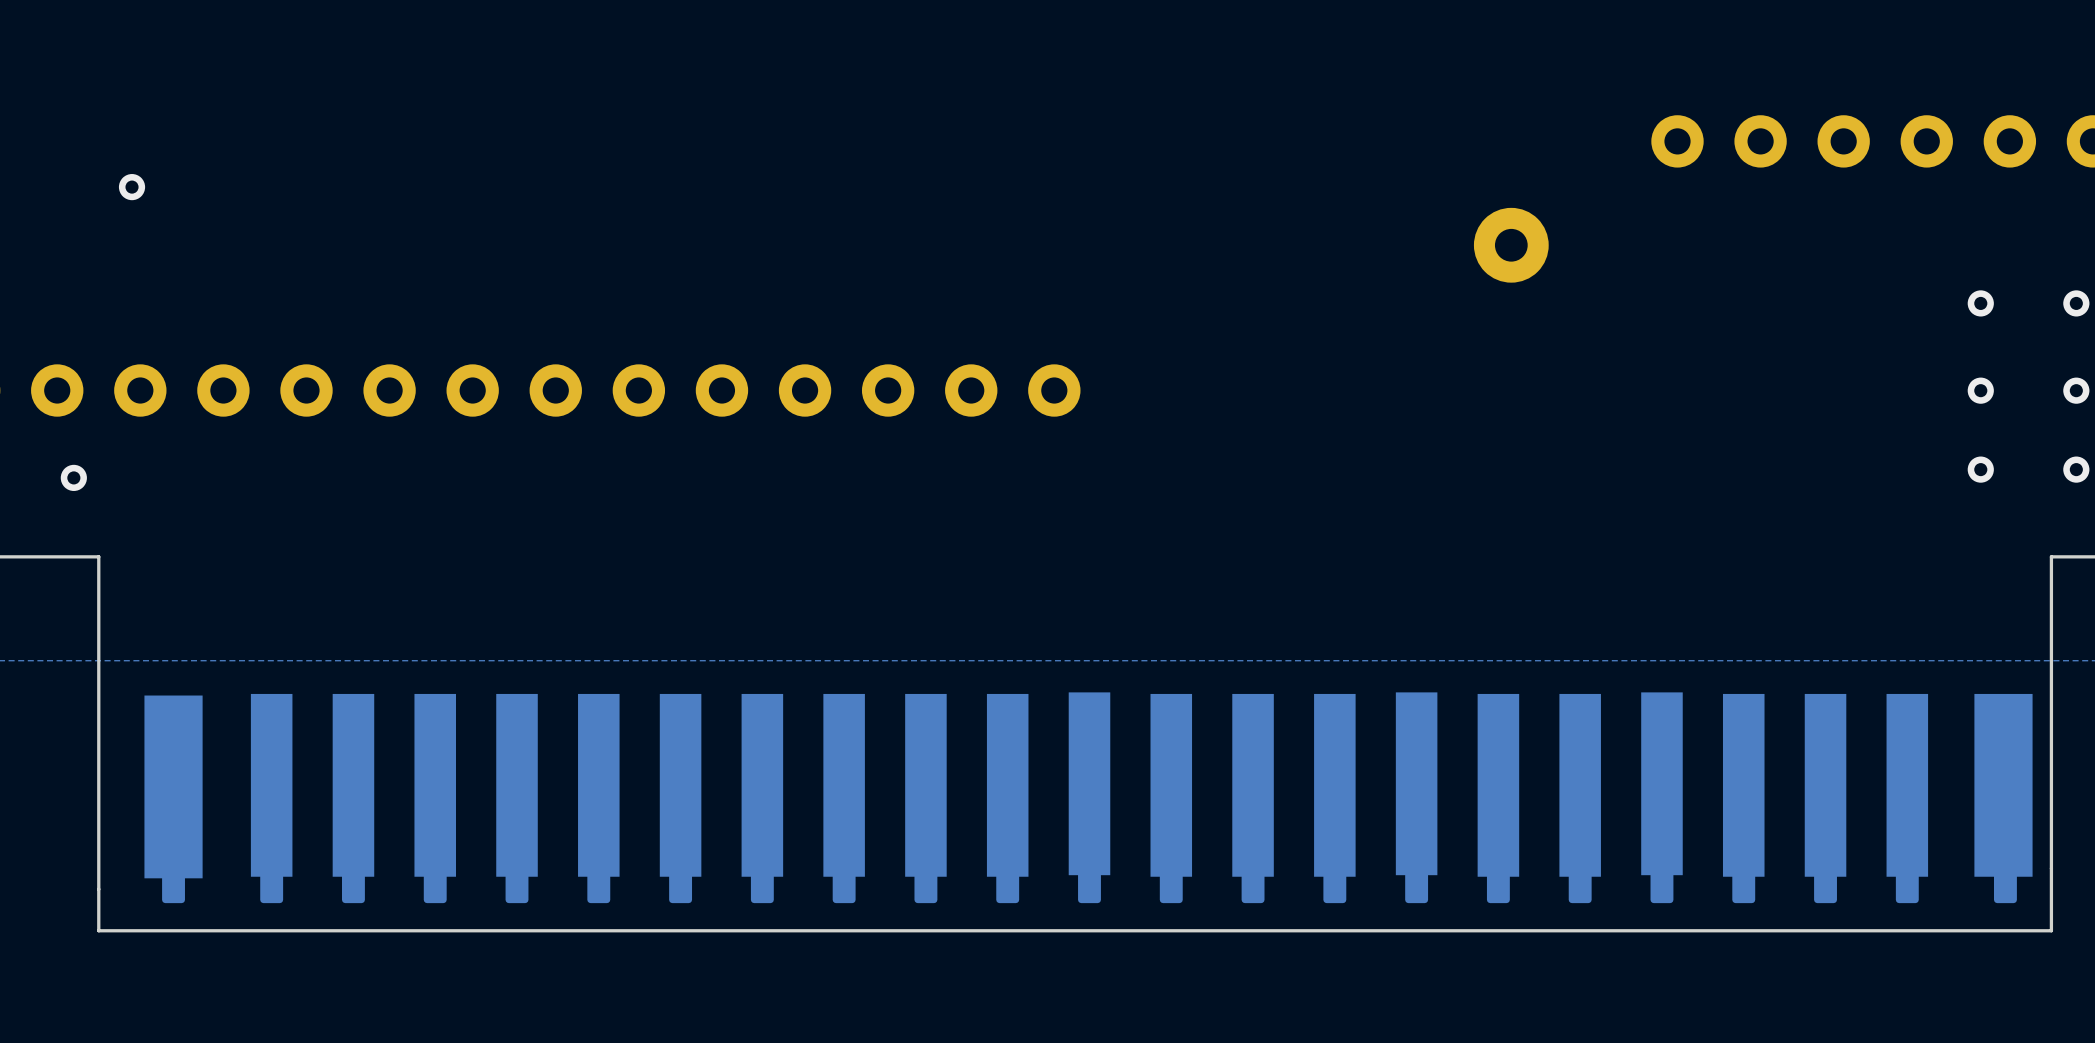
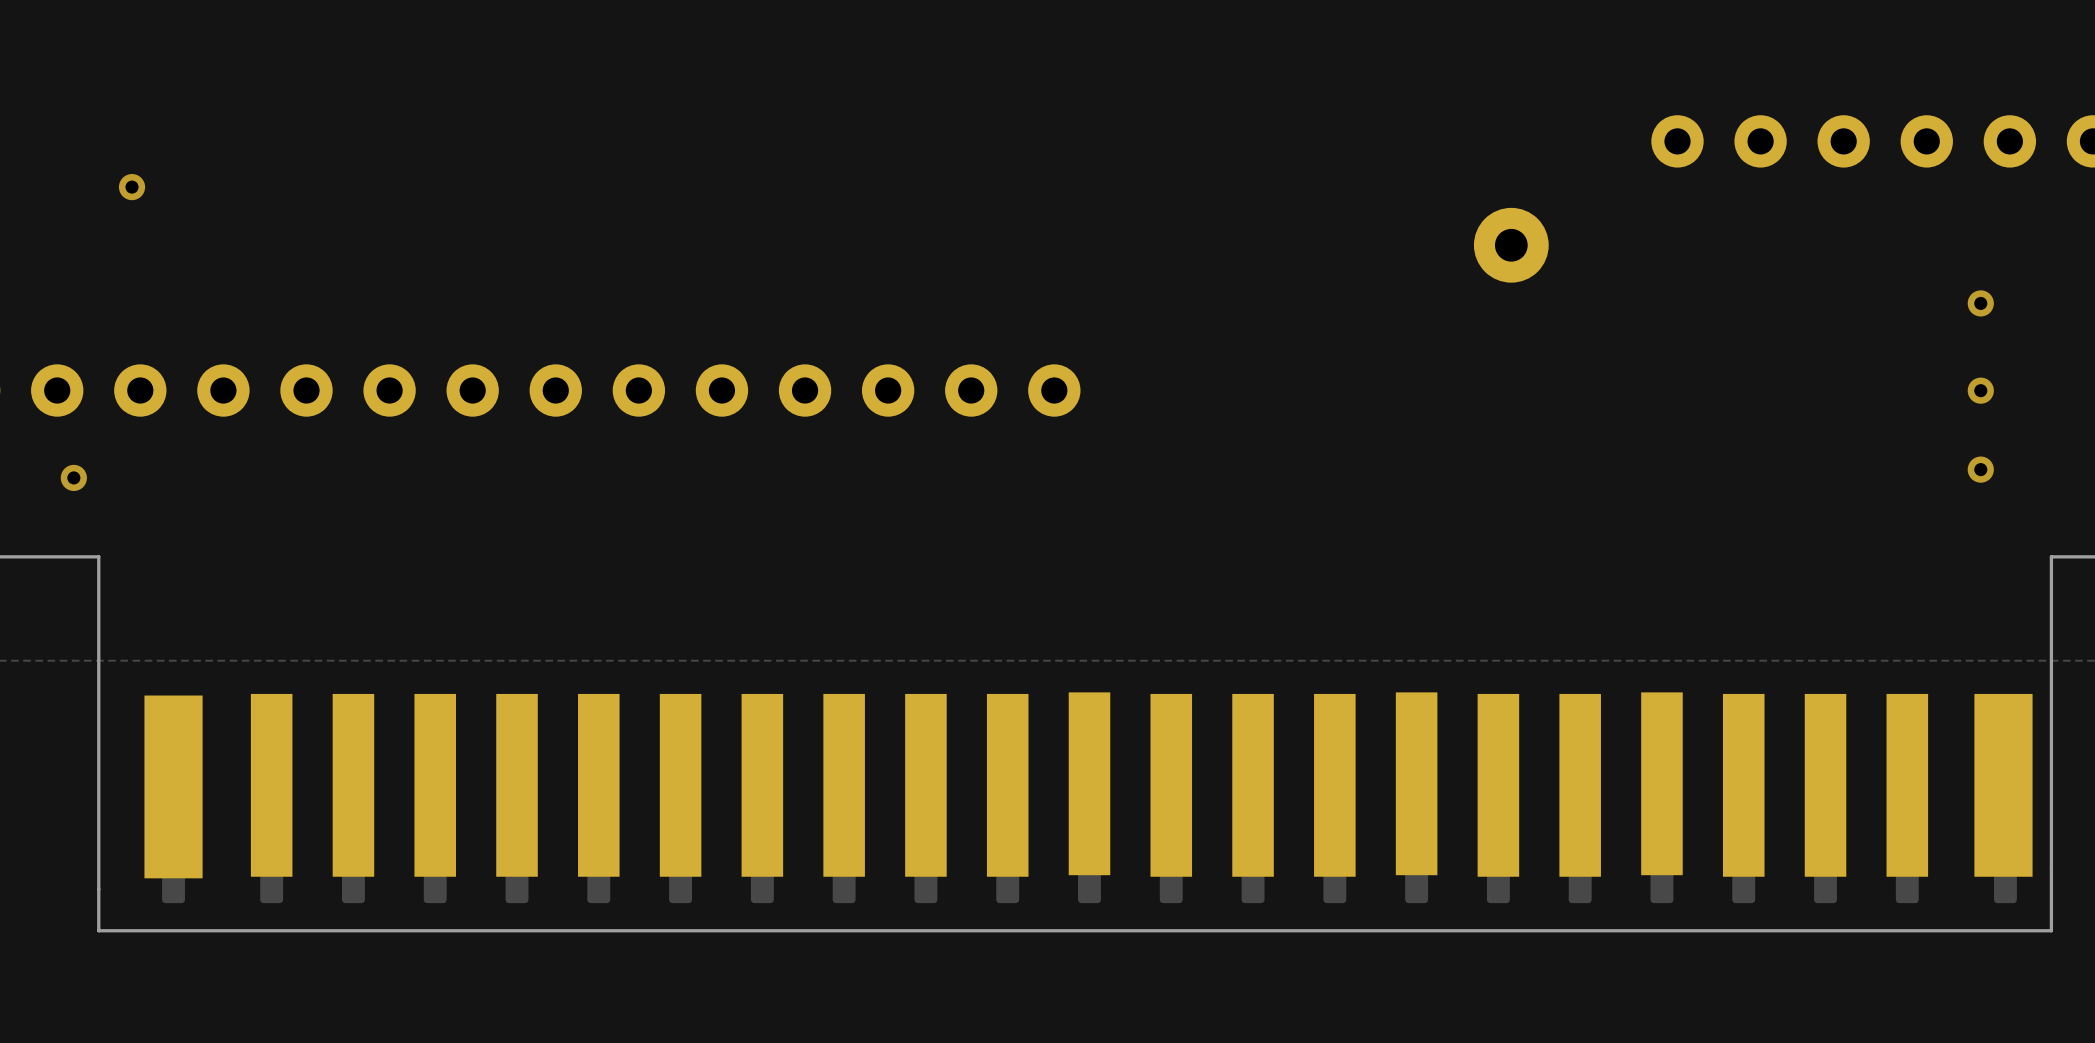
via: (2076, 303) -> none
via: (2076, 390) -> none
via: (2076, 469) -> none

